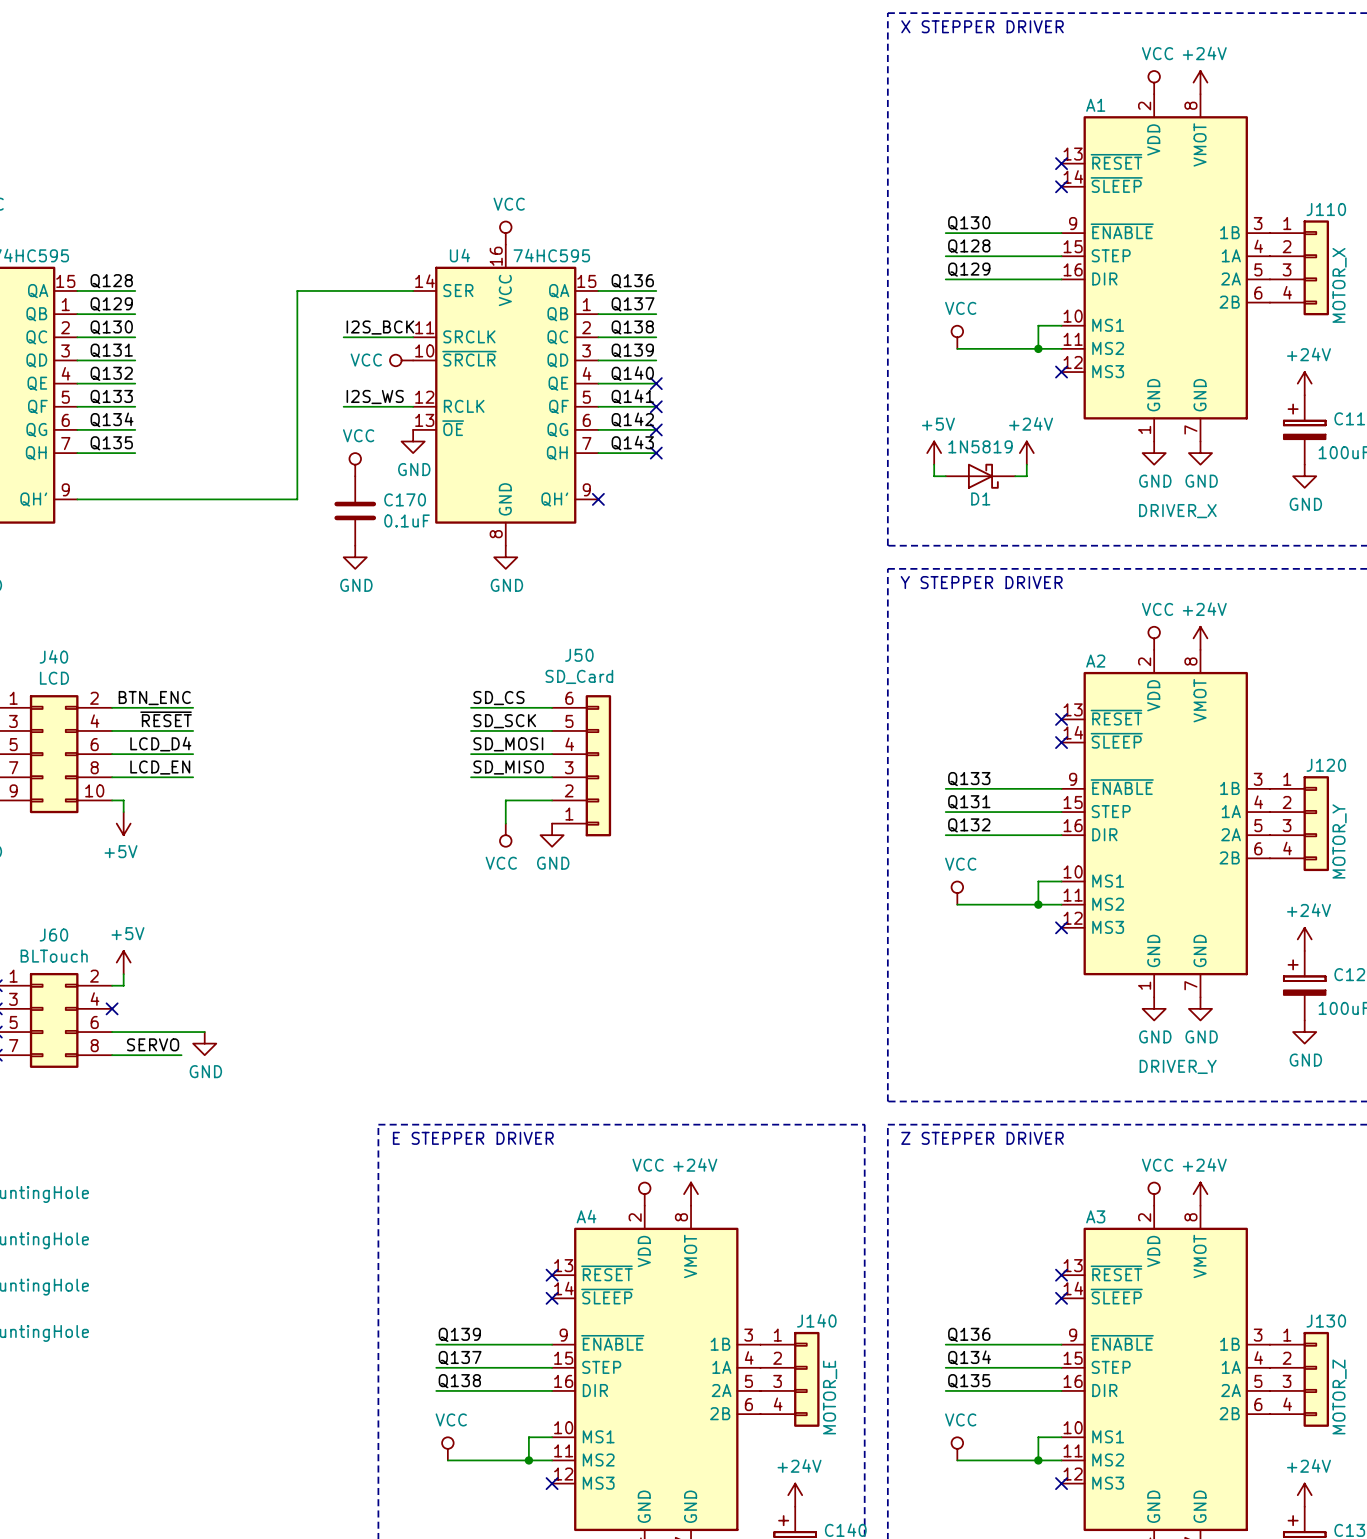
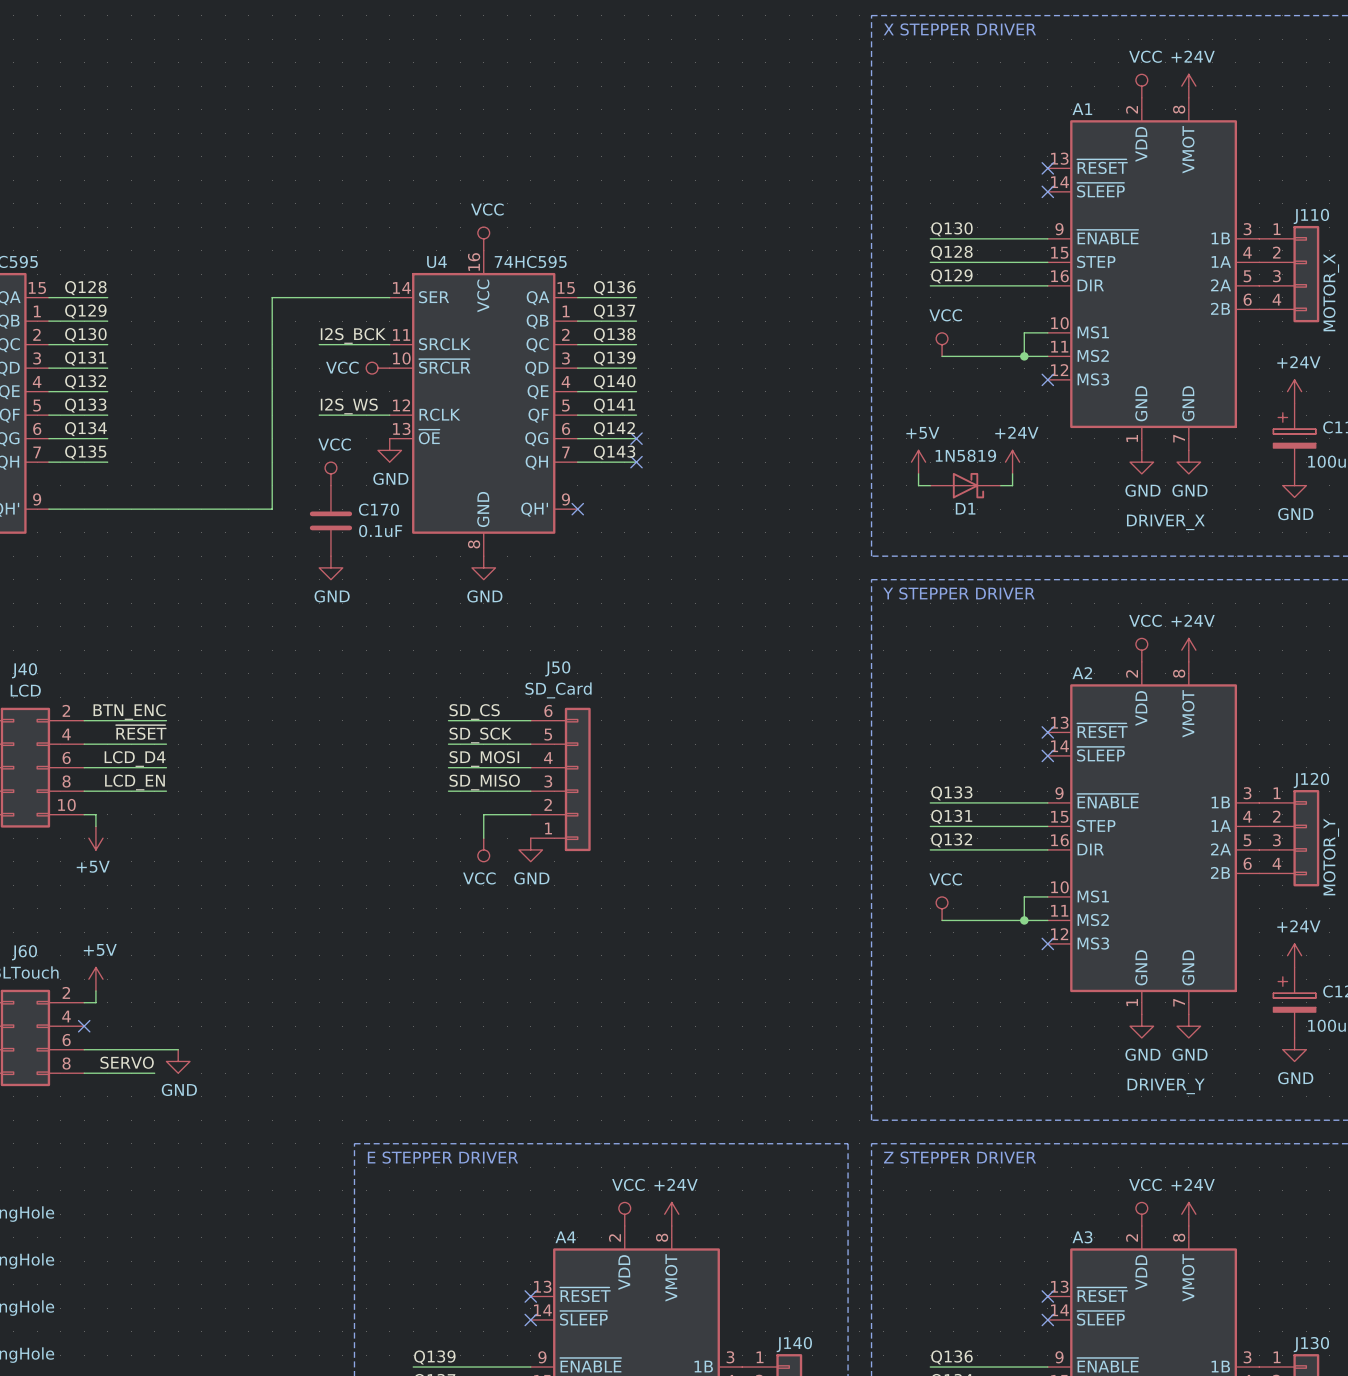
no-connect mark: (656, 383) -> none
no-connect mark: (656, 406) -> none

